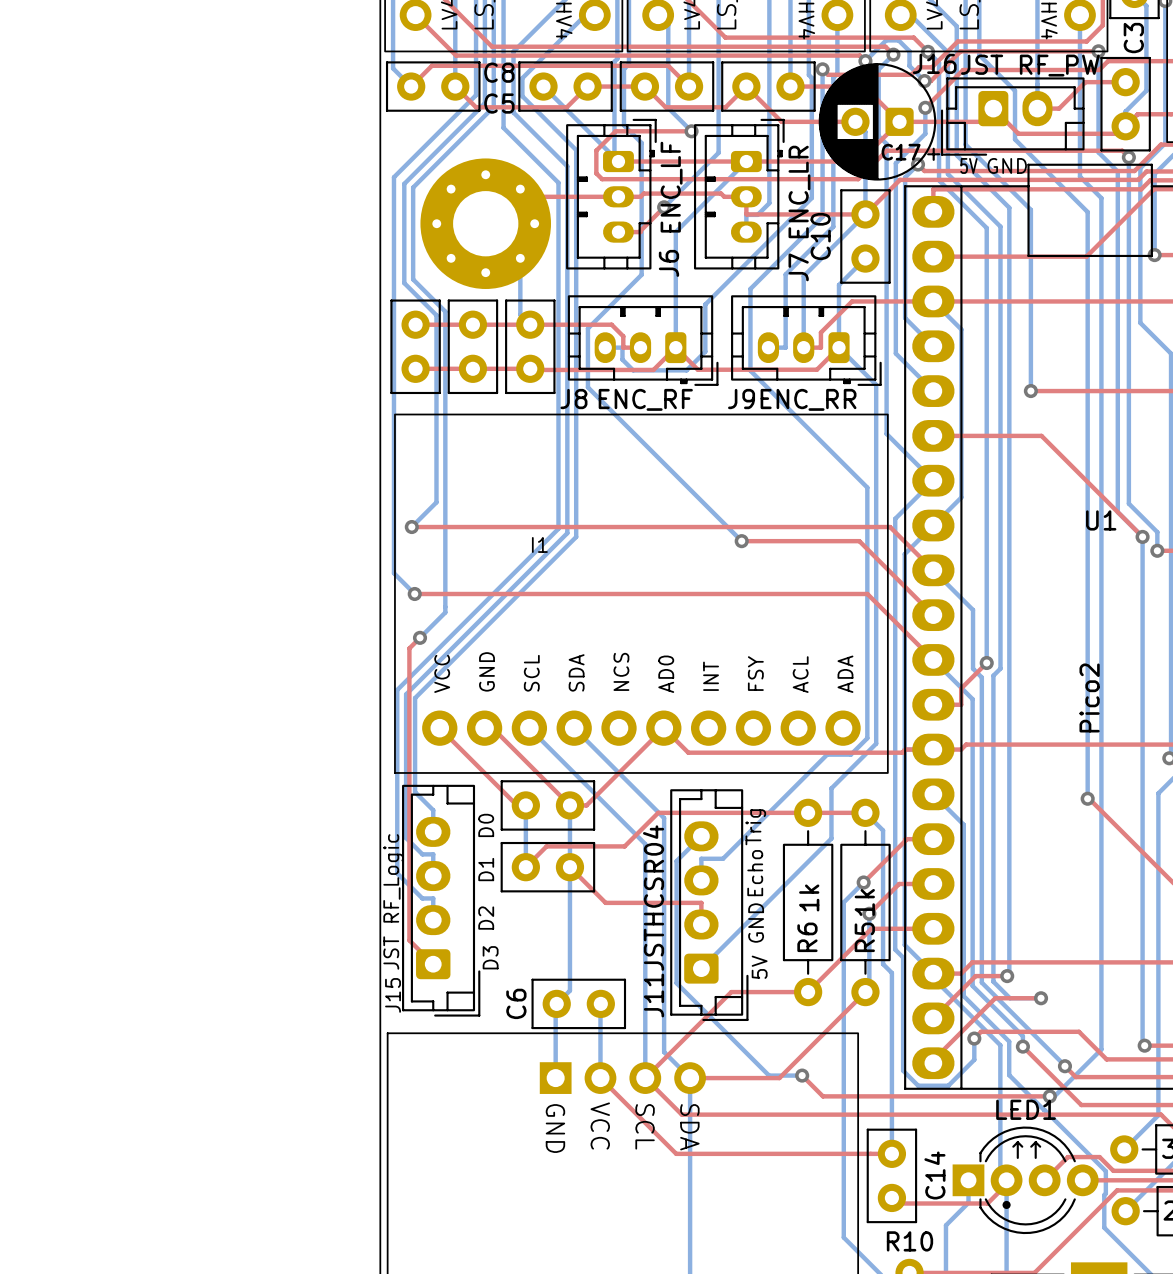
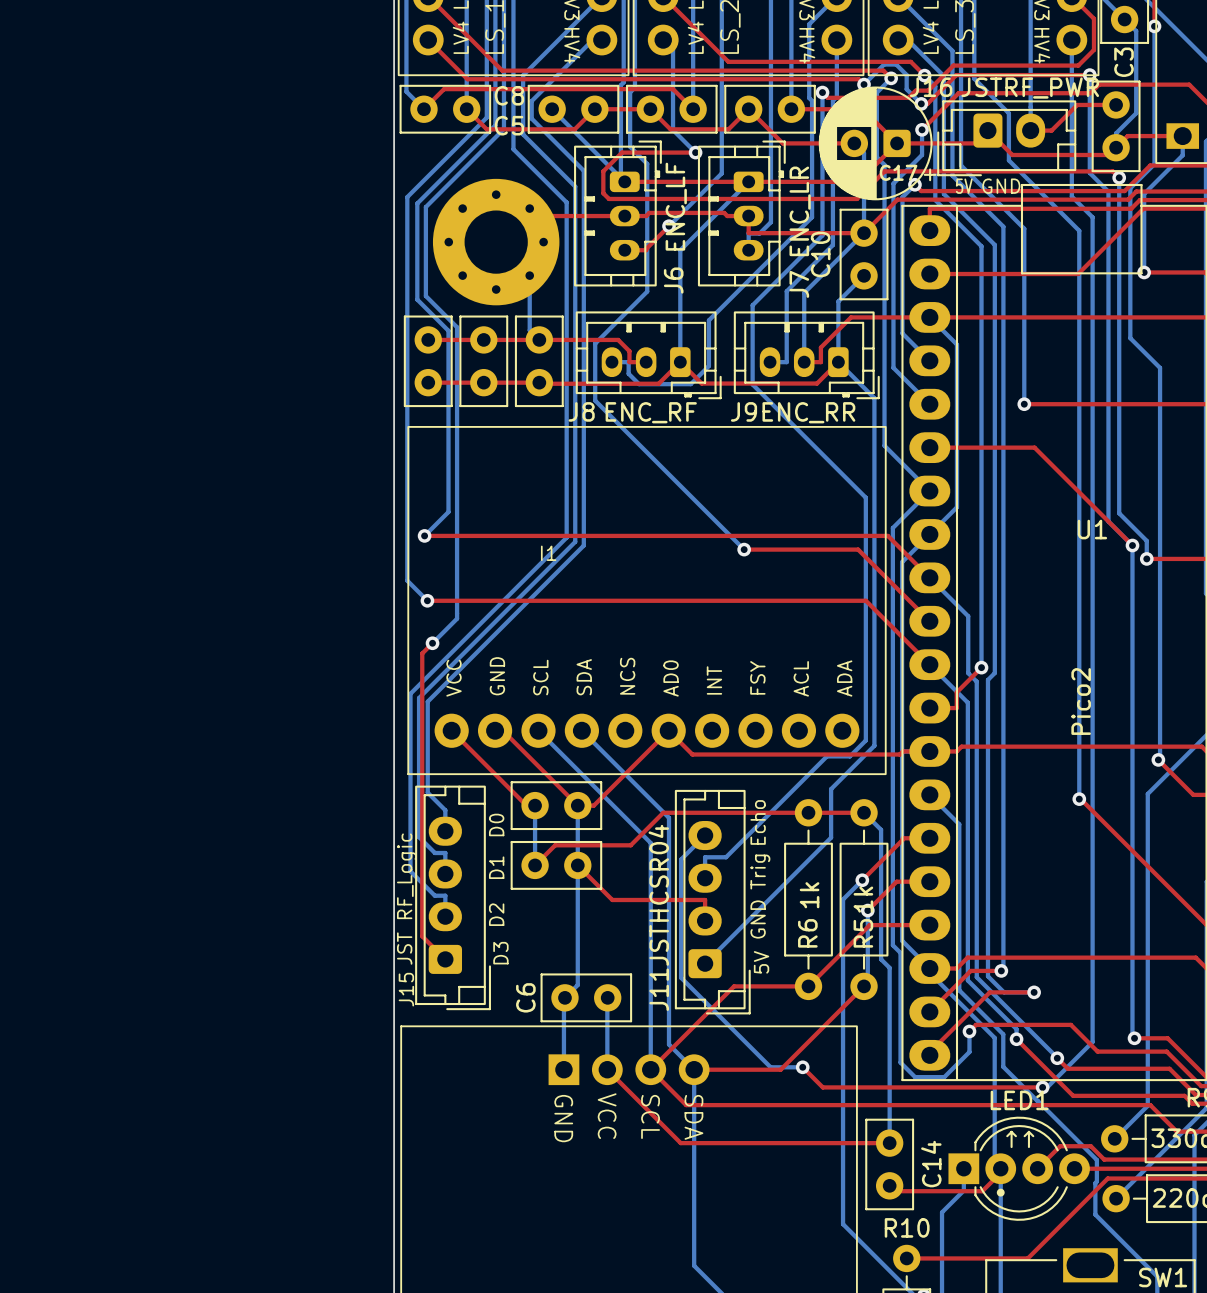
J16 value: JST RF_PW (1030, 65) -> JSTRF_PWR (1030, 88)
text: Trig (755, 827) -> Echo (758, 822)
text: Echo (755, 873) -> Trig (760, 872)

